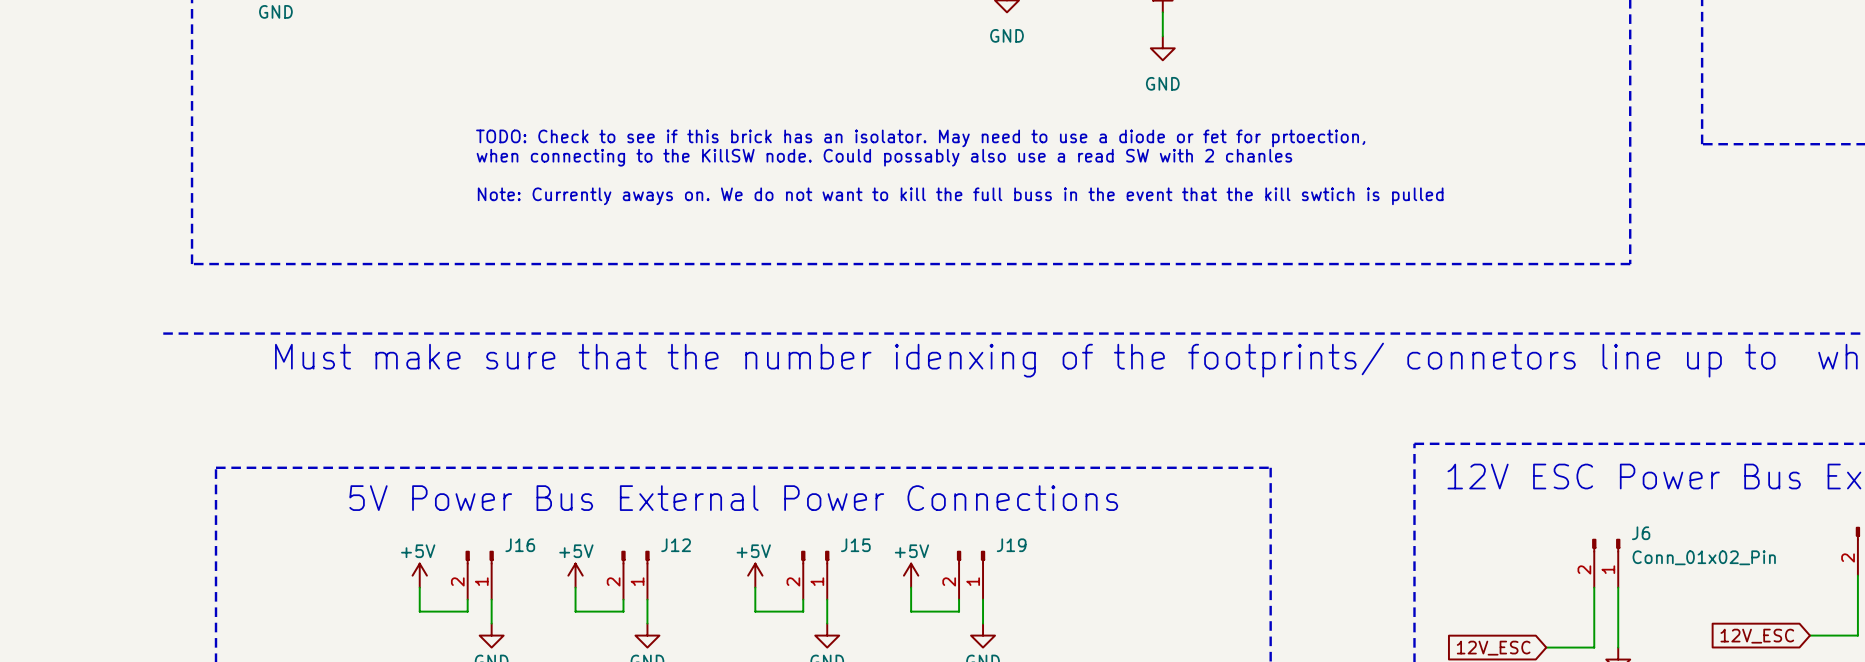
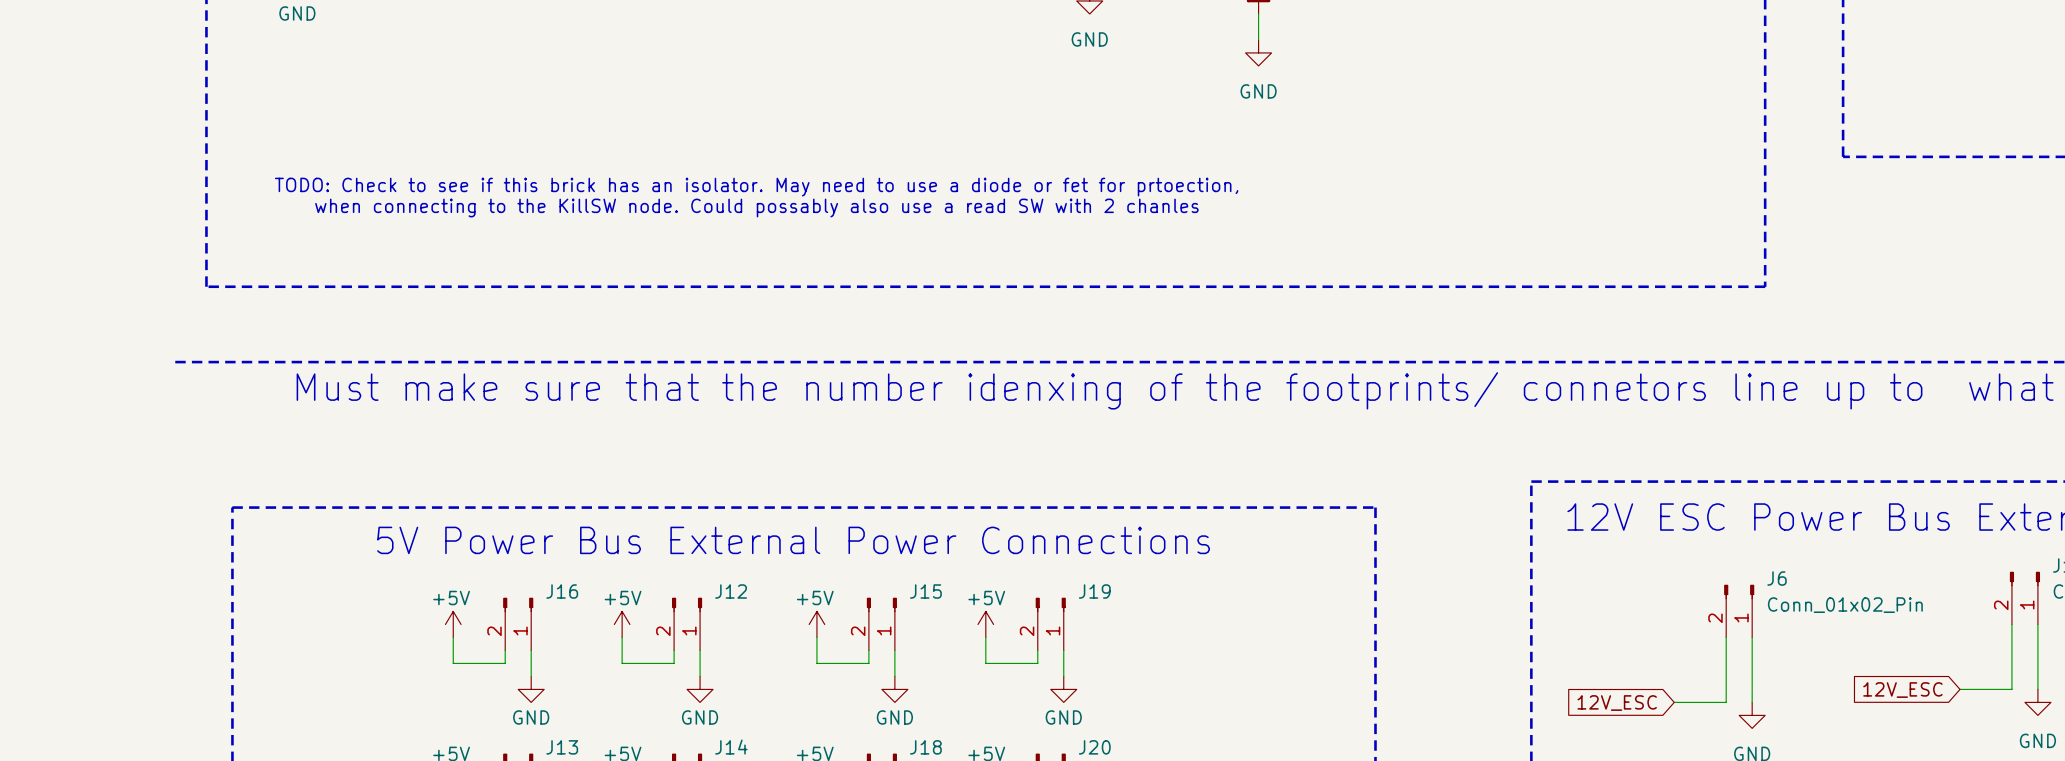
text position: TODO: Check to see if this brick has an isolator. May need to use a diode or fet for prtoection, (920, 138) -> TODO: Check to see if this brick has an isolator. May need to use a diode or fet for prtoection, (756, 187)
text position: when connecting to the KillSW node. Could possably also use a read SW with 2 chanles (884, 157) -> when connecting to the KillSW node. Could possably also use a read SW with 2 chanles (756, 208)
text: Note: Currently aways on. We do not want to kill the full buss in the event that the kill swtich is pulled (960, 196) -> none

